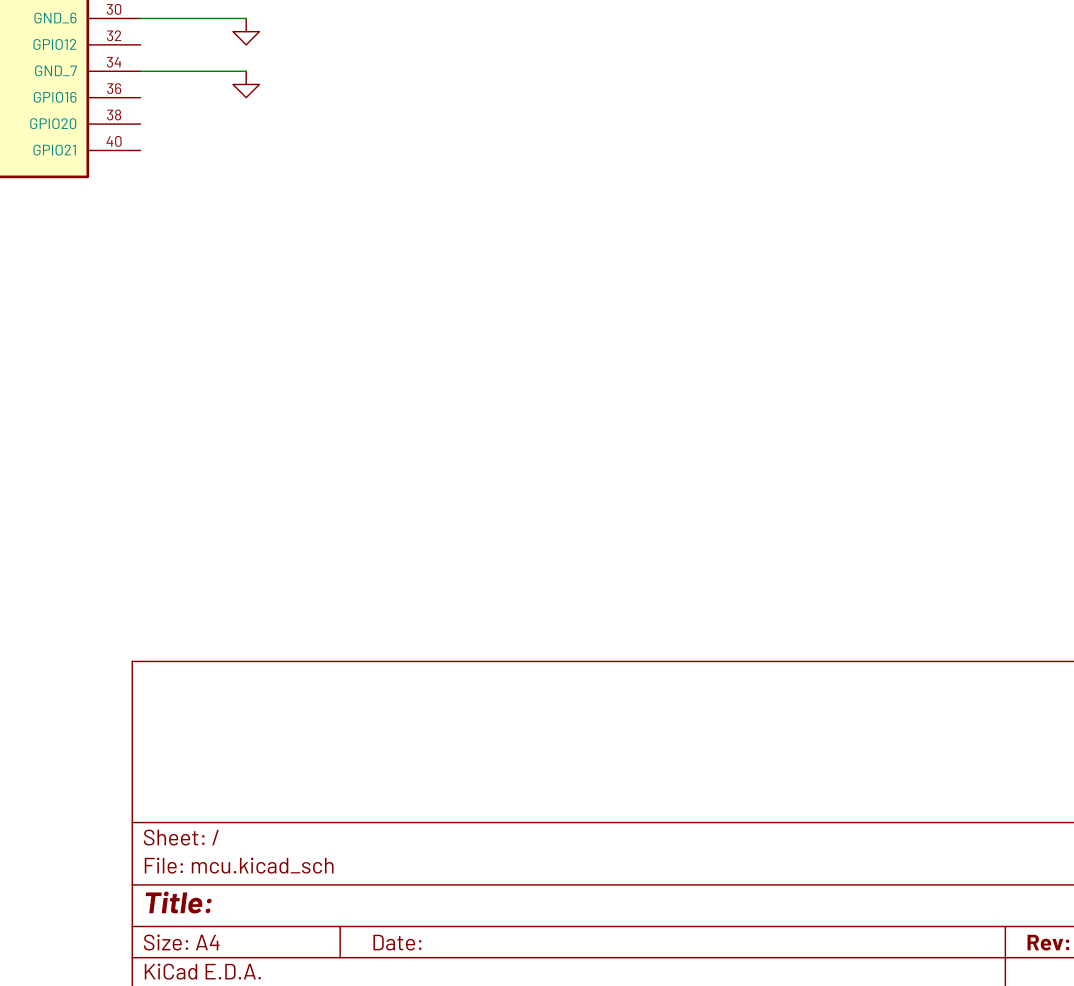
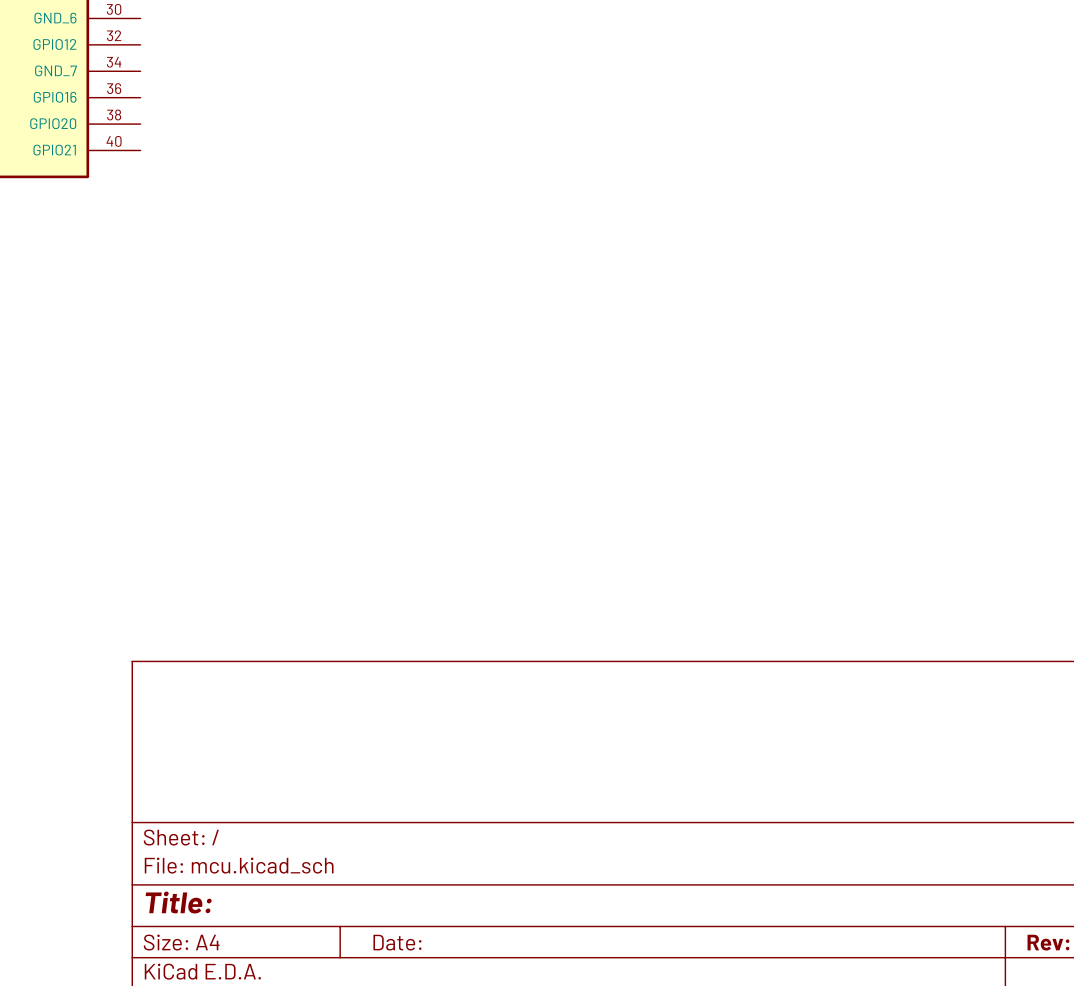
wire: (140, 18) (246, 18) -> none
power symbol: (246, 31) -> none
wire: (140, 71) (246, 71) -> none
power symbol: (246, 84) -> none

